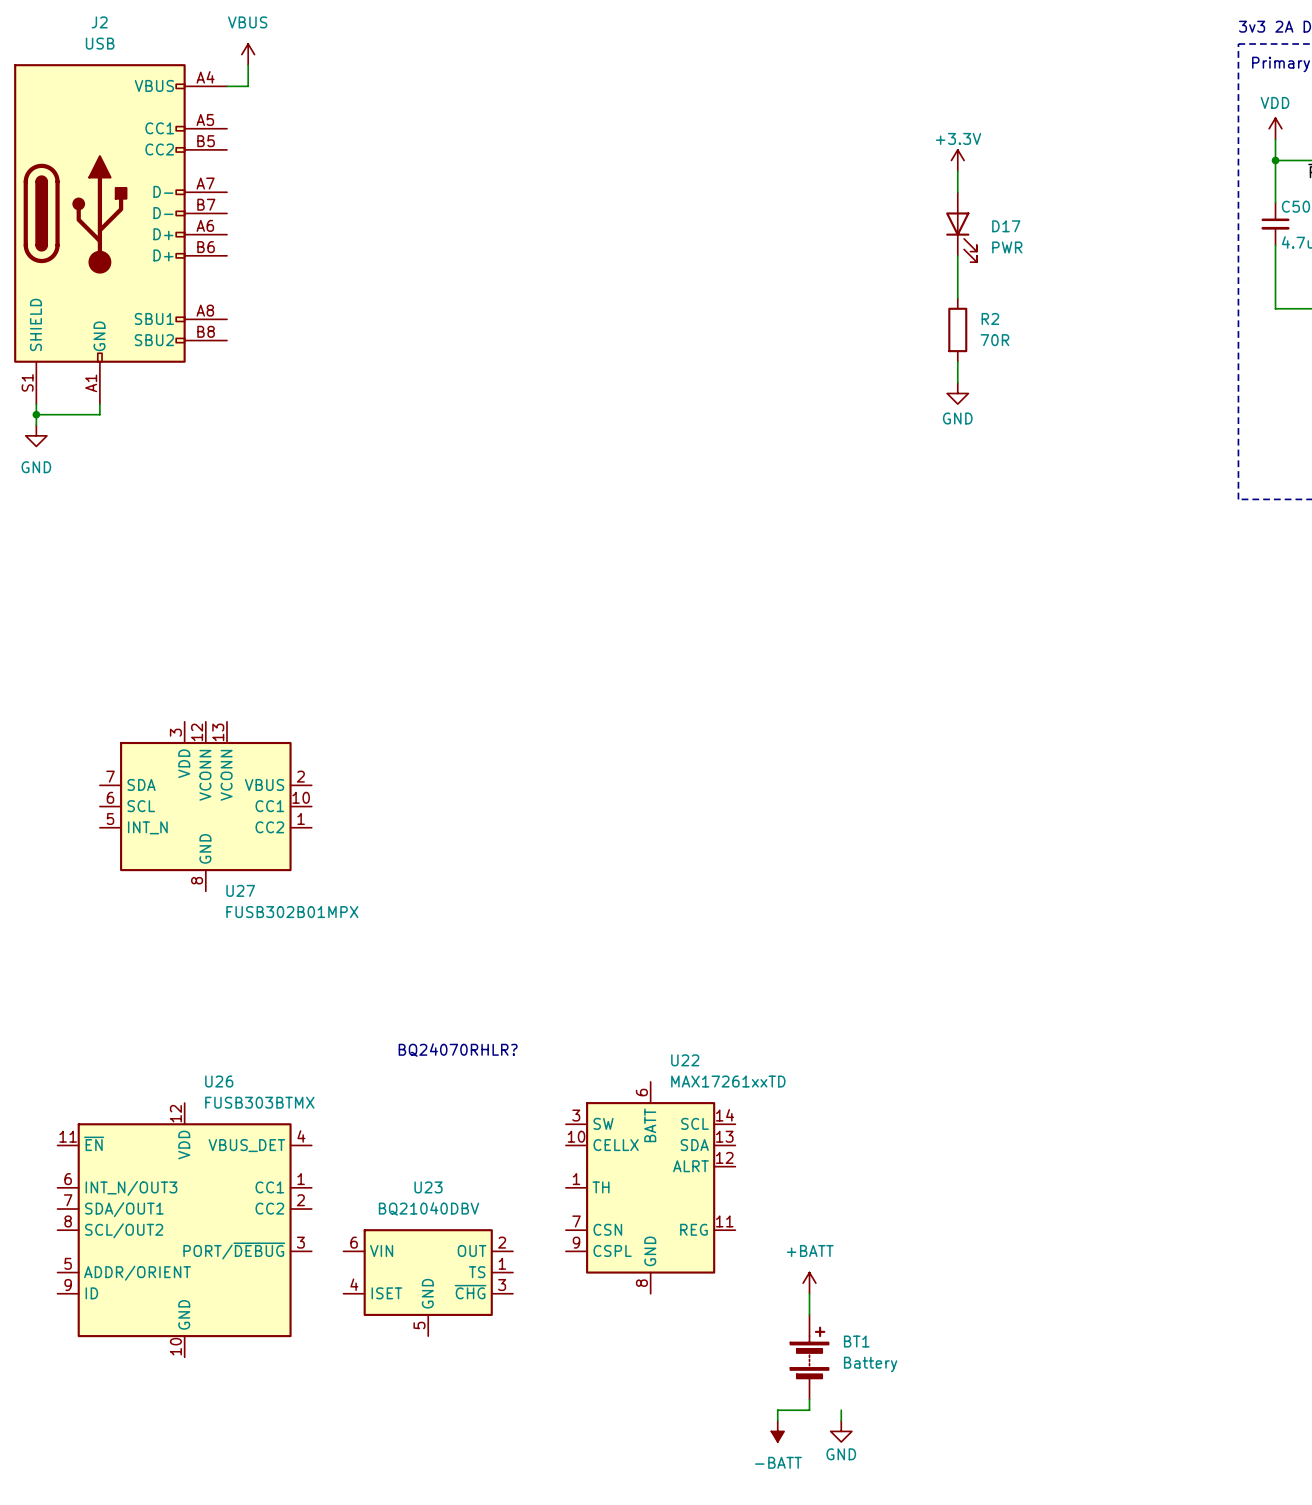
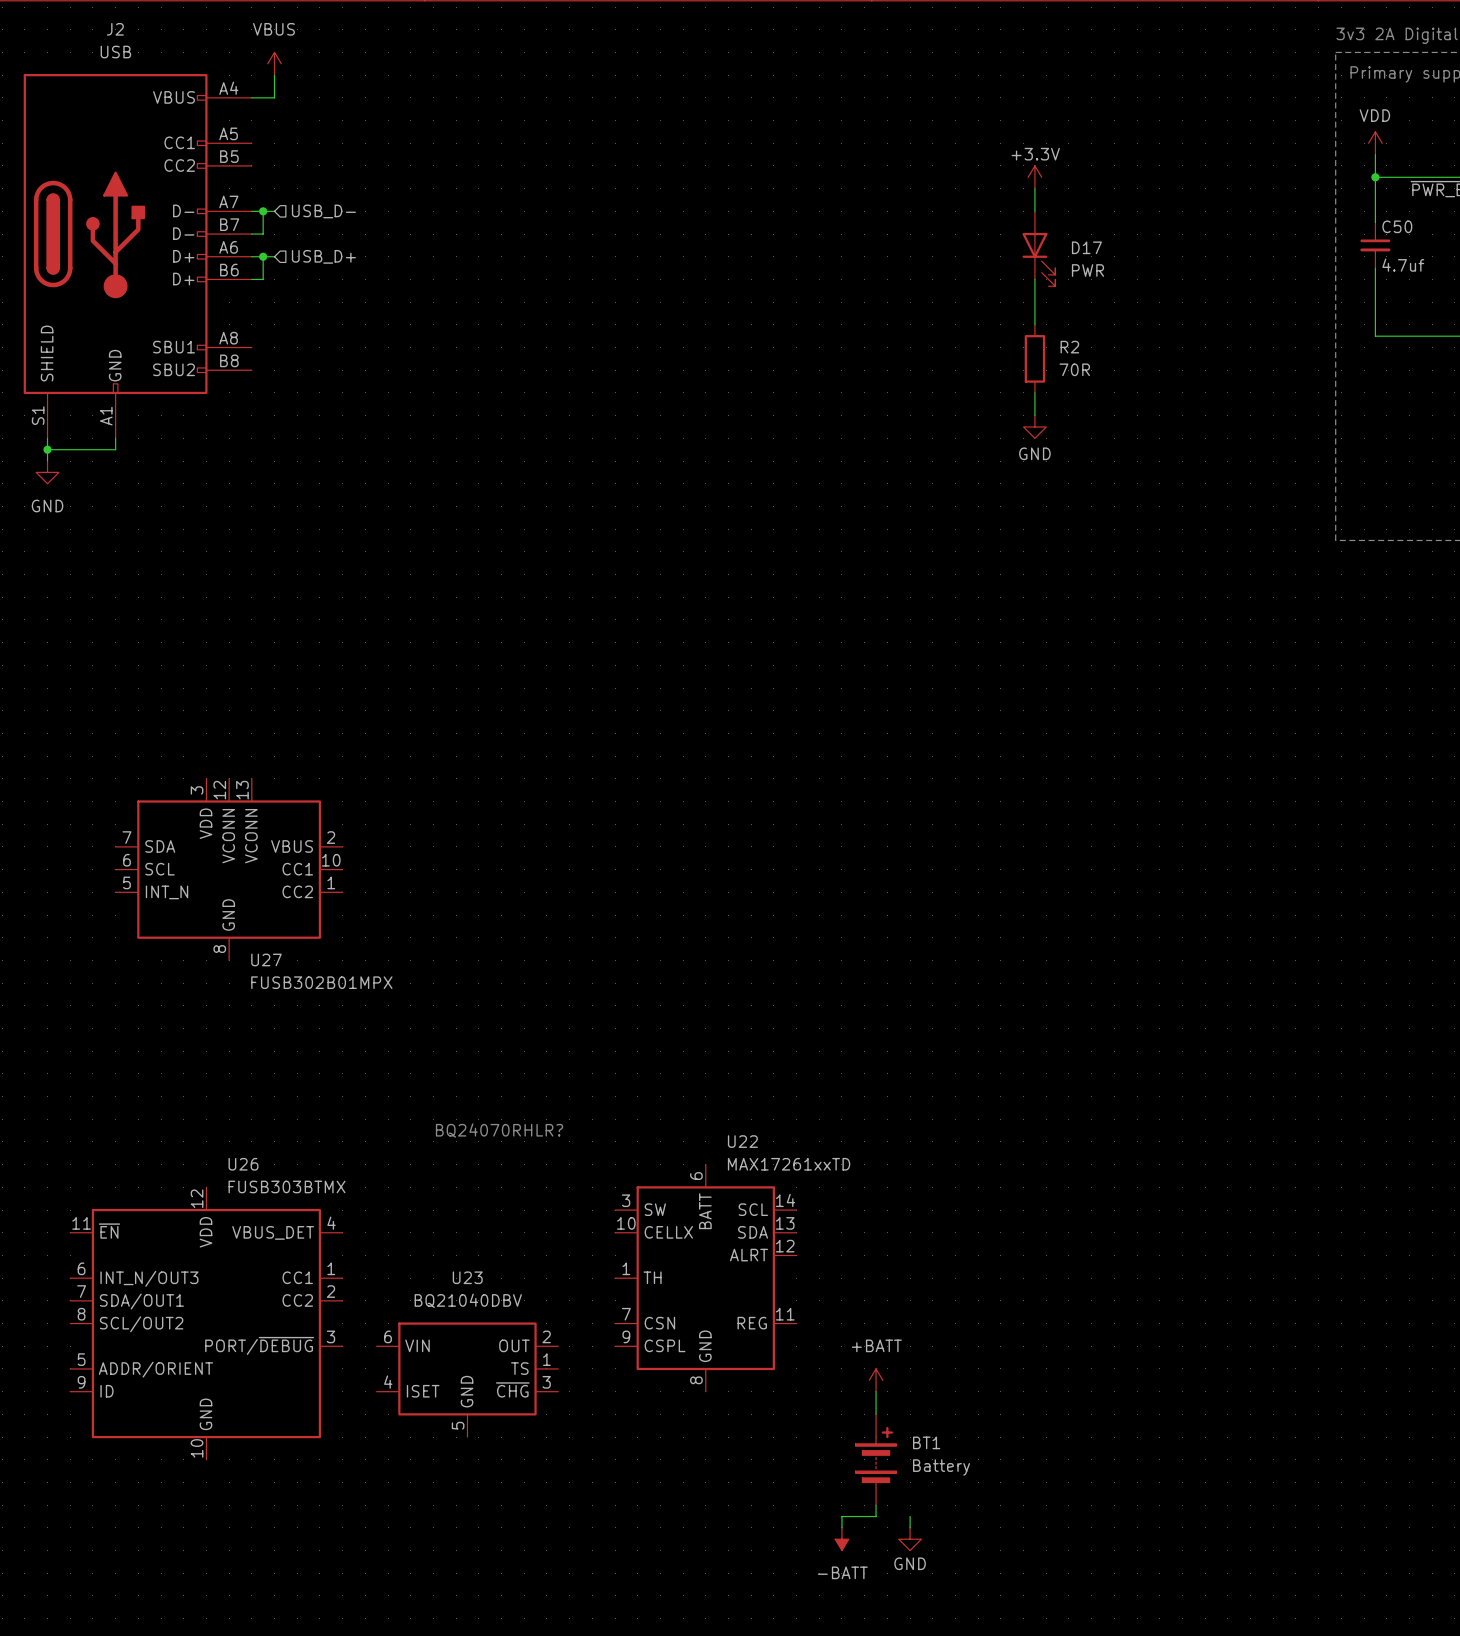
wire: none -> (251, 211) (274, 211)
wire: none -> (263, 211) (263, 234) (251, 234)
junction: none -> (263, 211)
hierarchical label: none -> USB_D- (323, 211)
wire: none -> (251, 256) (274, 256)
wire: none -> (263, 256) (263, 279) (251, 279)
junction: none -> (263, 256)
hierarchical label: none -> USB_D+ (323, 256)

